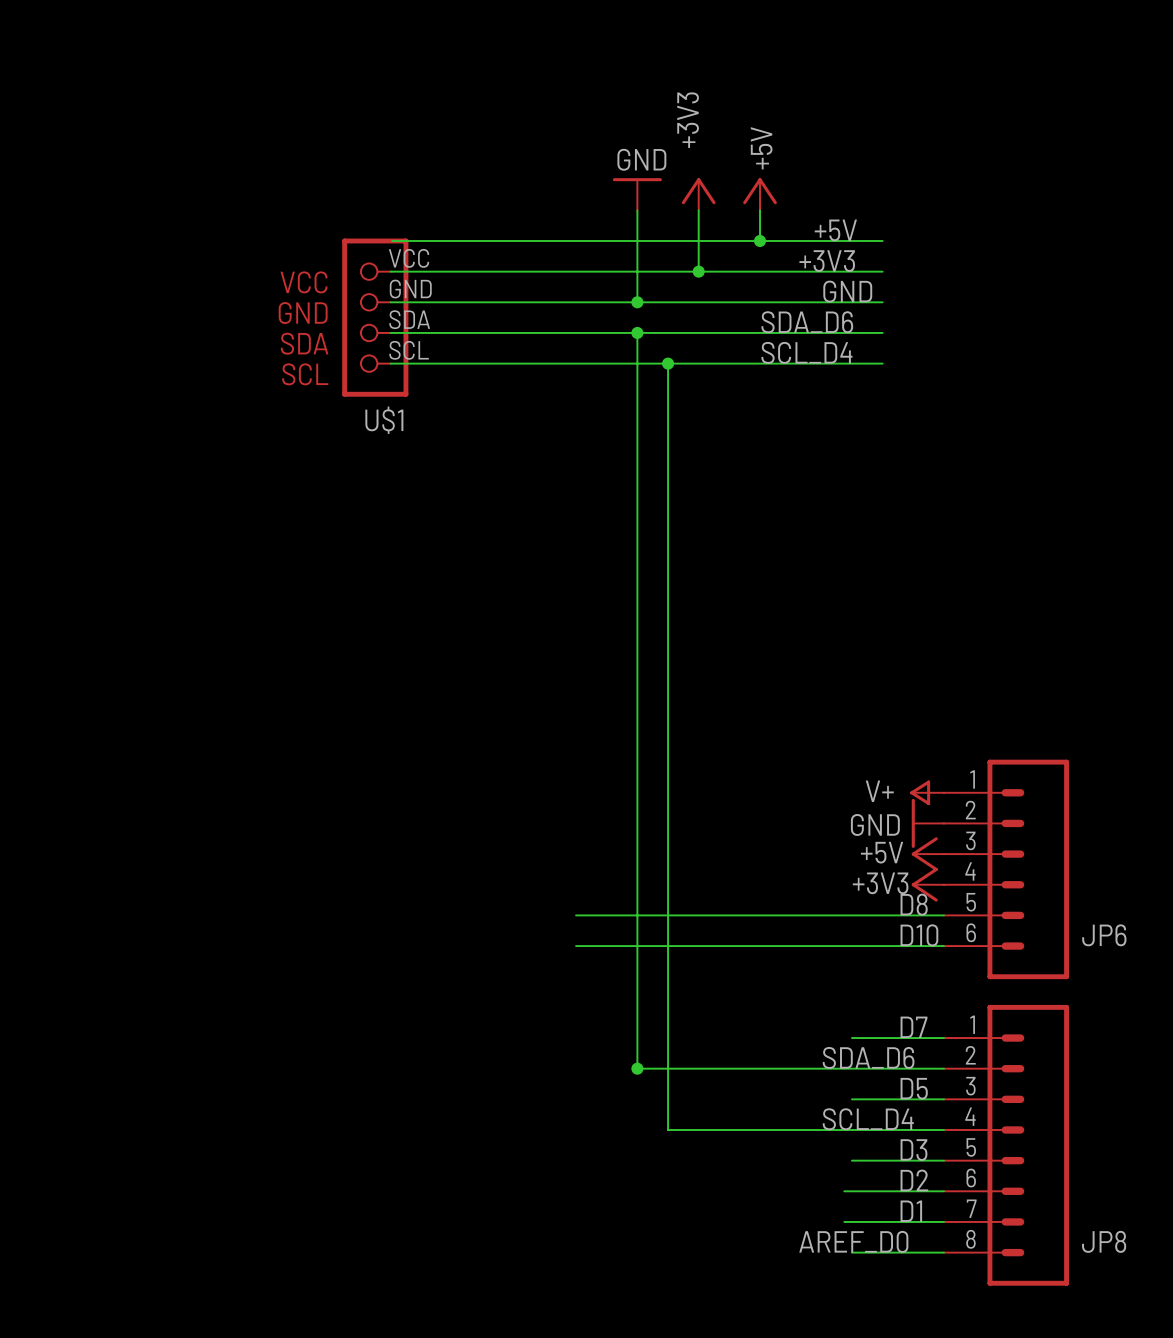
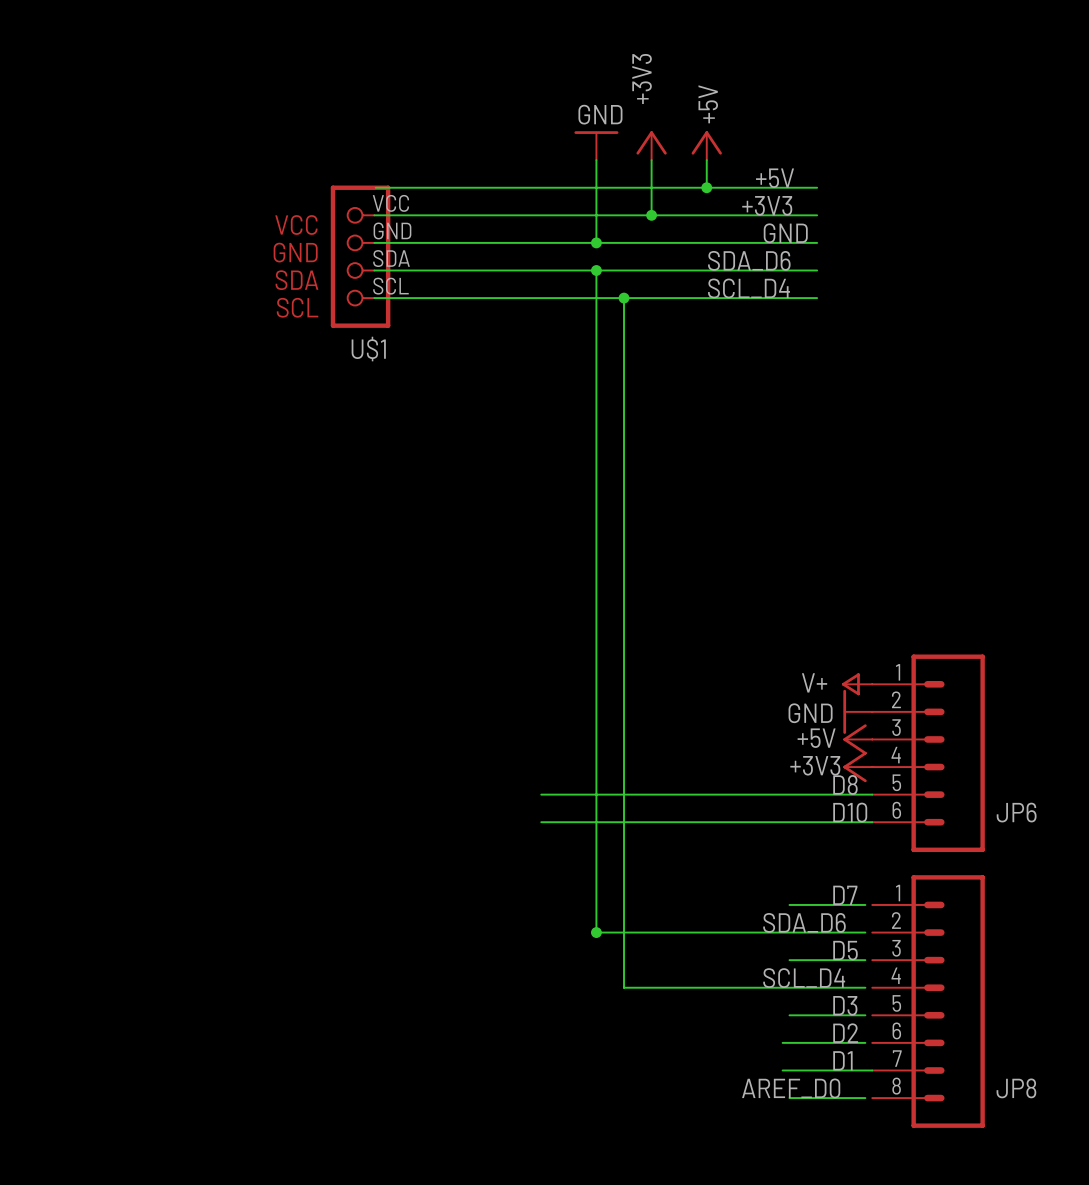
wire: (936, 1038) (943, 1038) -> none
wire: (936, 1068) (943, 1068) -> none
wire: (936, 1099) (943, 1099) -> none
wire: (936, 1129) (943, 1129) -> none
wire: (936, 1160) (943, 1160) -> none
wire: (936, 1191) (943, 1191) -> none
wire: (936, 1252) (943, 1252) -> none

